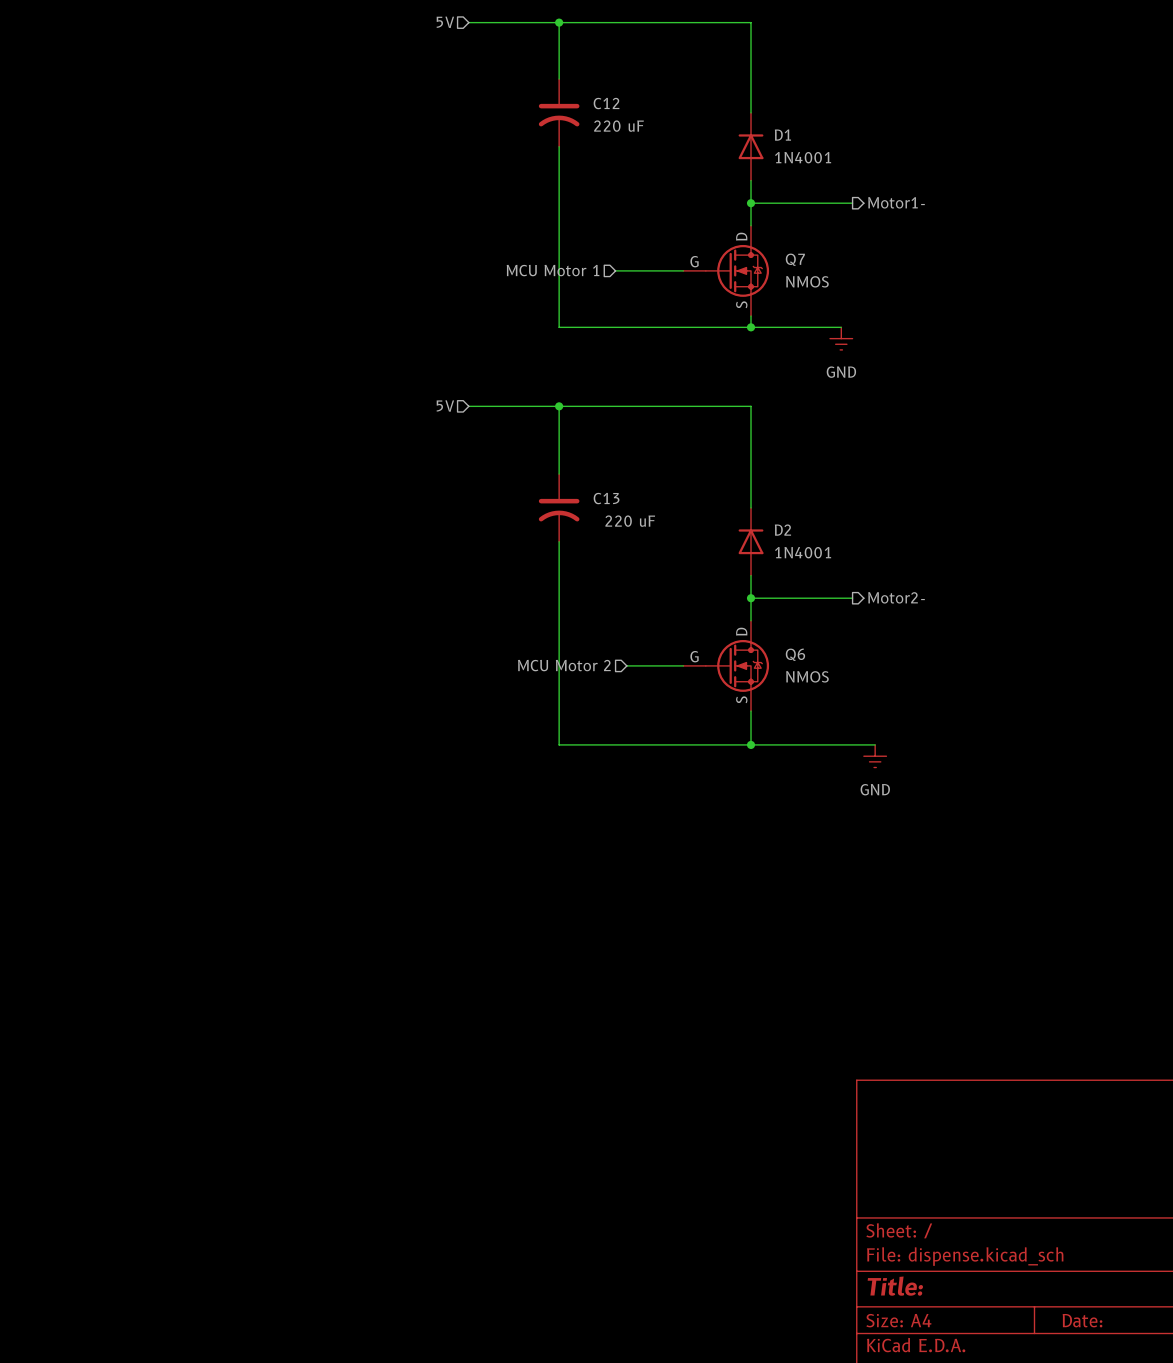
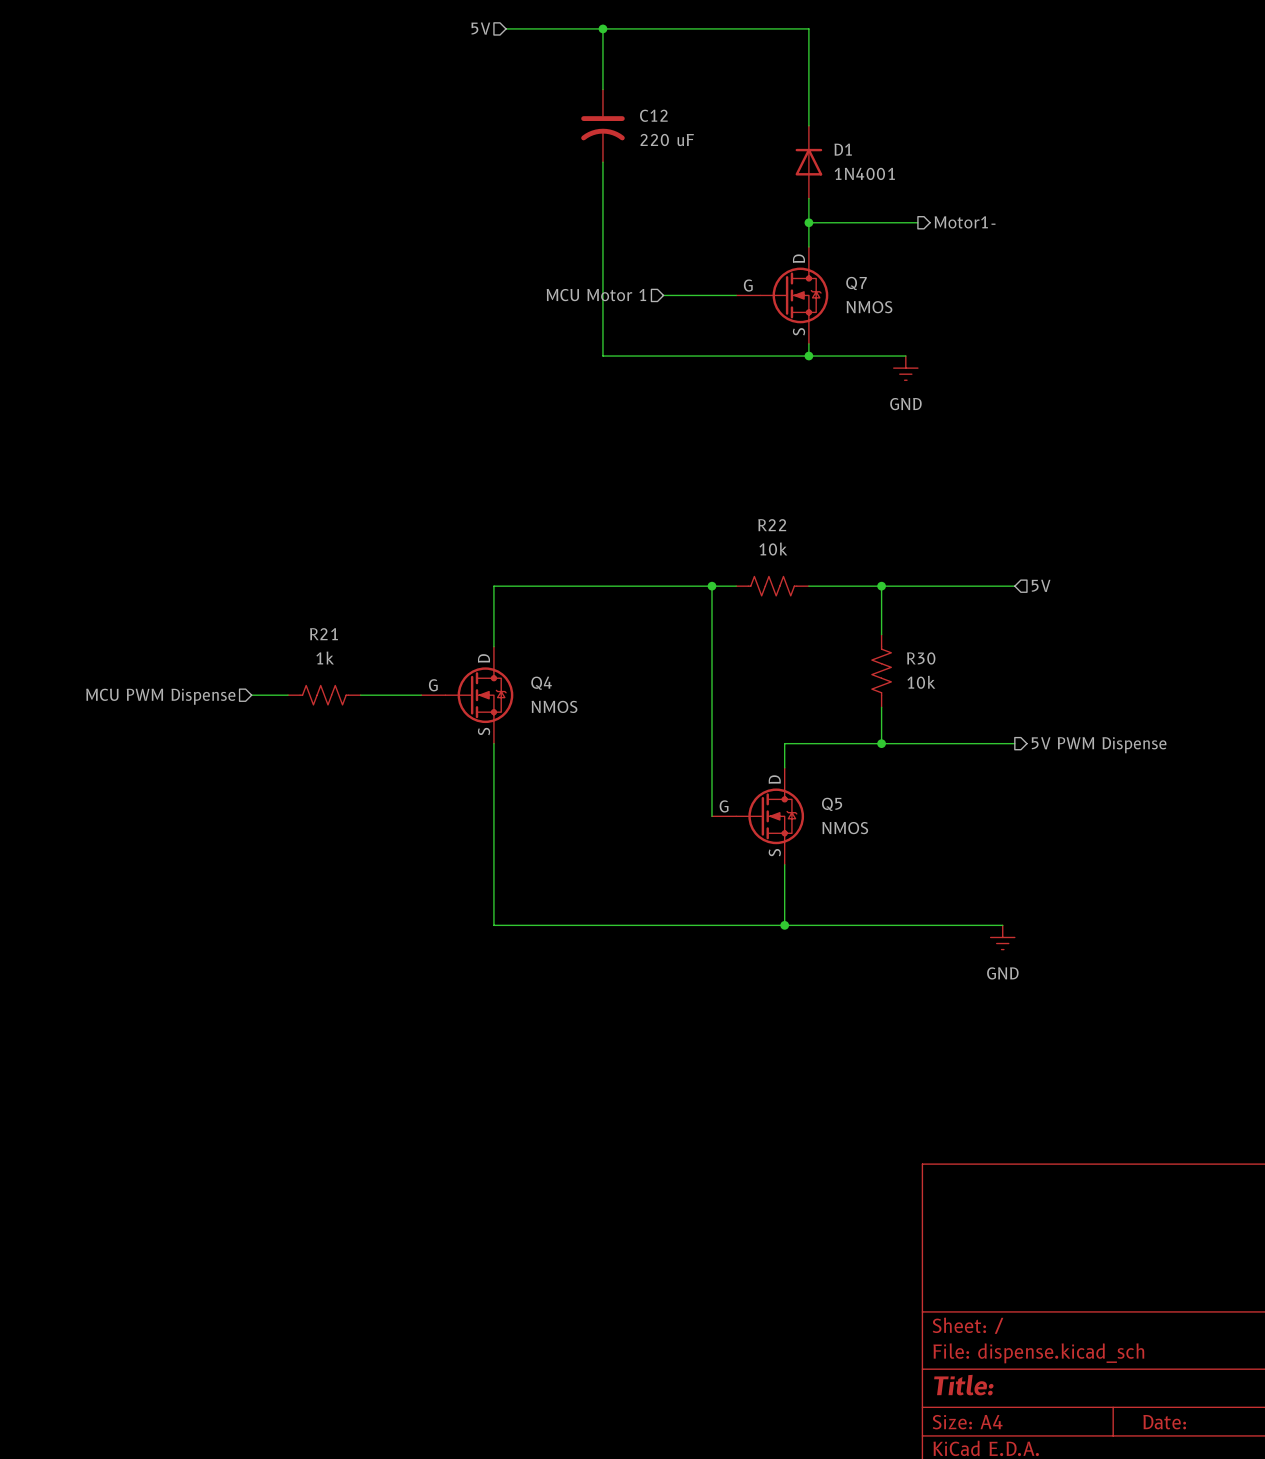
hierarchical label: 5V (445, 406) -> none
wire: (468, 406) (751, 406) (751, 507) -> none
wire: (559, 406) (559, 474) -> none
junction: (559, 406) -> none
C13: 220 uF (559, 507) -> none
wire: (559, 541) (559, 744) (875, 744) -> none
wire: none -> (712, 586) (712, 816)
junction: none -> (712, 586)
wire: none -> (736, 586) (493, 586) (493, 646)
R22: none -> 10k (772, 586)
wire: none -> (808, 586) (1014, 586)
D2: 1N4001 (751, 541) -> none
junction: none -> (881, 586)
hierarchical label: none -> 5V (1041, 585)
wire: (751, 575) (751, 620) -> (881, 586) (881, 634)
hierarchical label: Motor2- (896, 597) -> none
wire: (751, 598) (852, 598) -> none
junction: (751, 598) -> none
R30: none -> 10k (881, 670)
wire: none -> (251, 695) (288, 695)
R21: none -> 1k (324, 695)
wire: none -> (360, 695) (421, 695)
Q4: none -> NMOS (467, 695)
hierarchical label: none -> MCU PWM Dispense (160, 696)
hierarchical label: MCU Motor 2 (564, 665) -> none
wire: (626, 665) (683, 665) -> none
Q6: NMOS (726, 665) -> none
wire: none -> (493, 743) (493, 925) (1002, 925)
junction: none -> (881, 743)
wire: none -> (1014, 743) (784, 743) (784, 767)
hierarchical label: none -> 5V PWM Dispense (1099, 745)
wire: (751, 711) (751, 744) -> (881, 707) (881, 743)
junction: (751, 744) -> none
Q5: none -> NMOS (758, 816)
power symbol position: GND (875, 756) -> GND (1002, 937)
wire: none -> (784, 864) (784, 925)
junction: none -> (784, 925)

